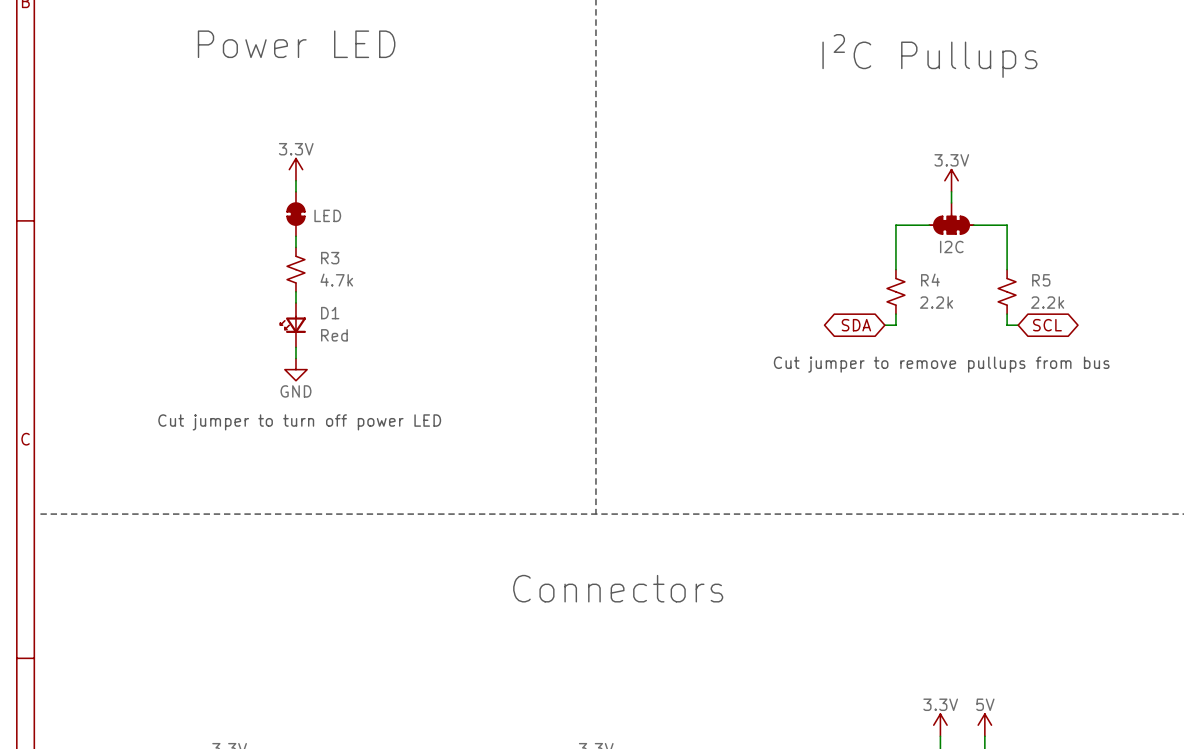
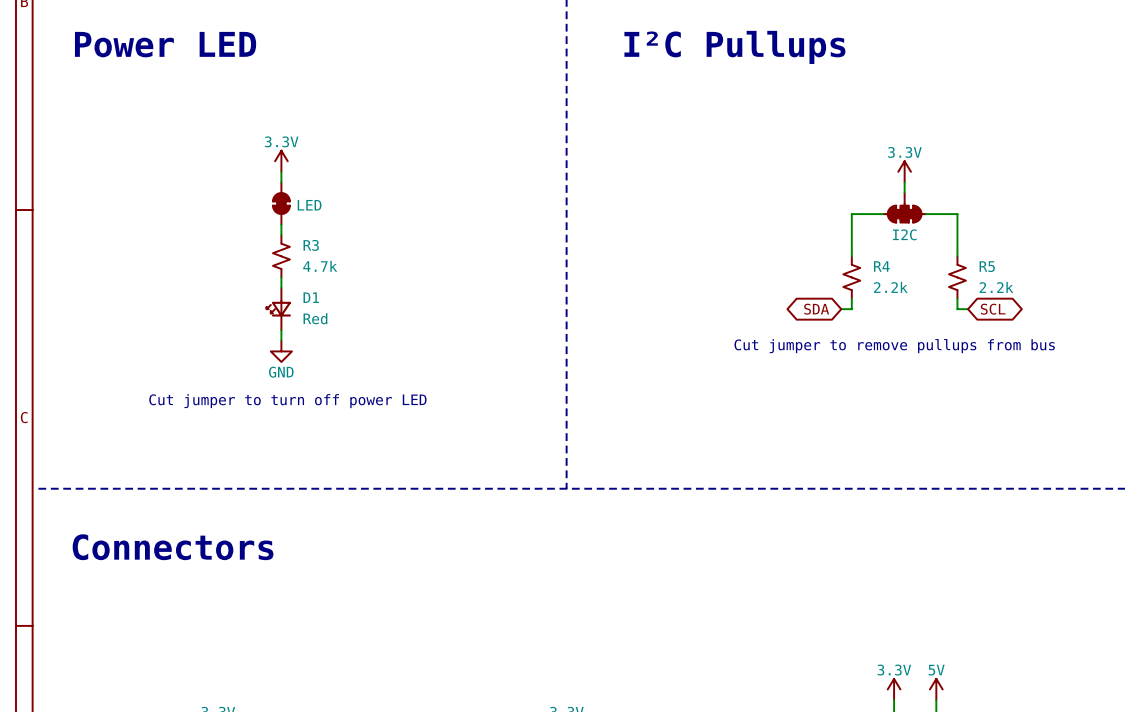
text: Power LED (296, 44) -> none
text: none -> Power LED (165, 44)
text: none -> I²C Pullups (734, 47)
text: I²C Pullups (929, 55) -> none
text: none -> Connectors (173, 547)
text: Connectors (618, 588) -> none

